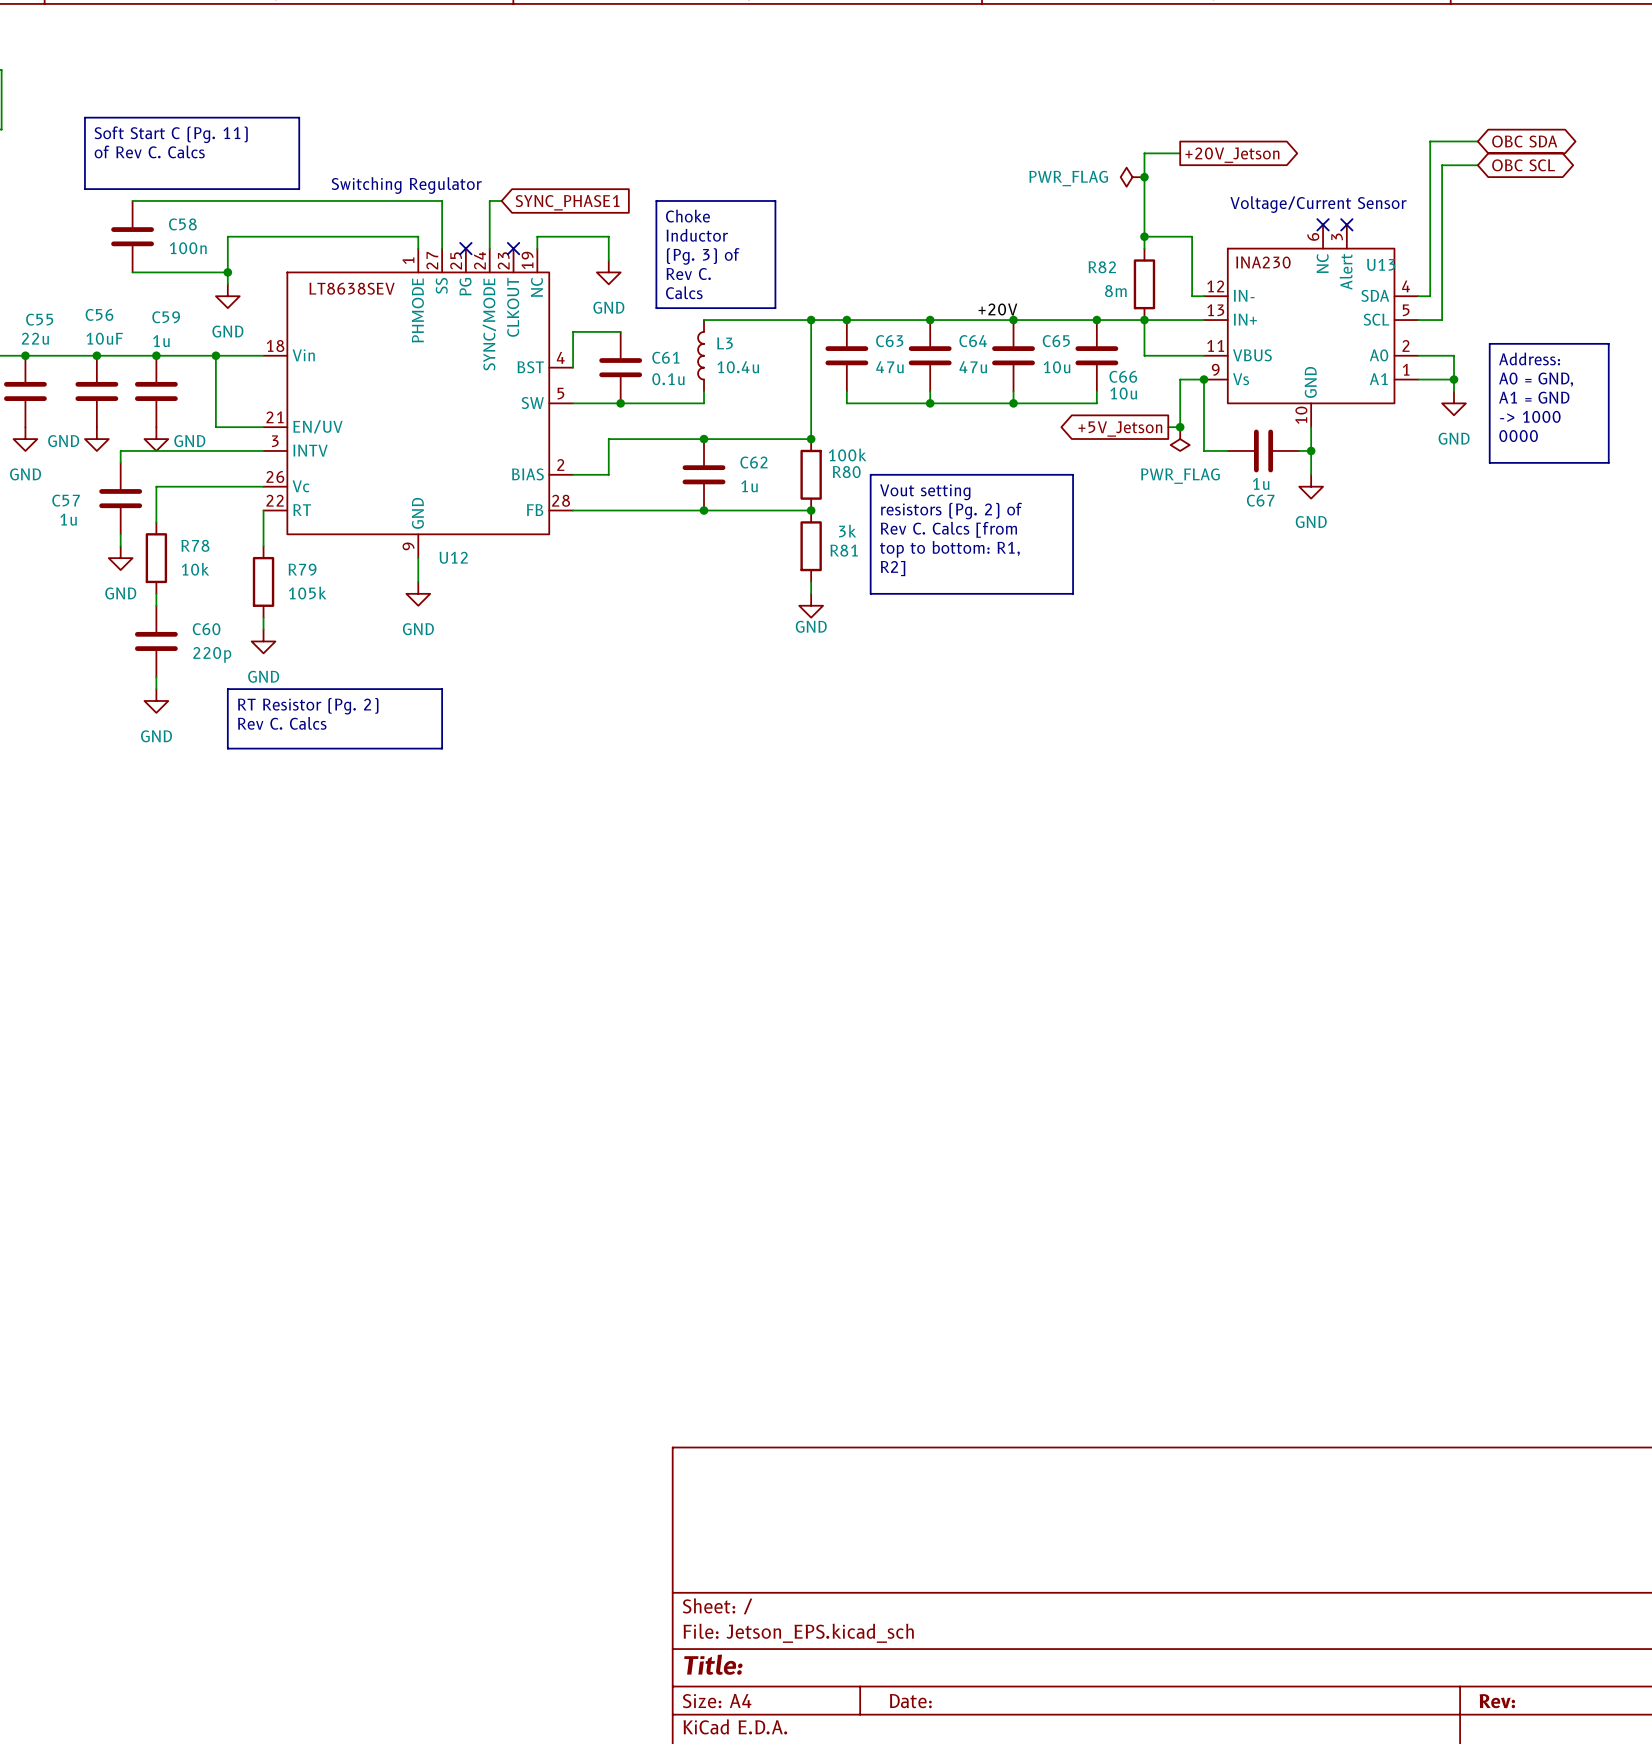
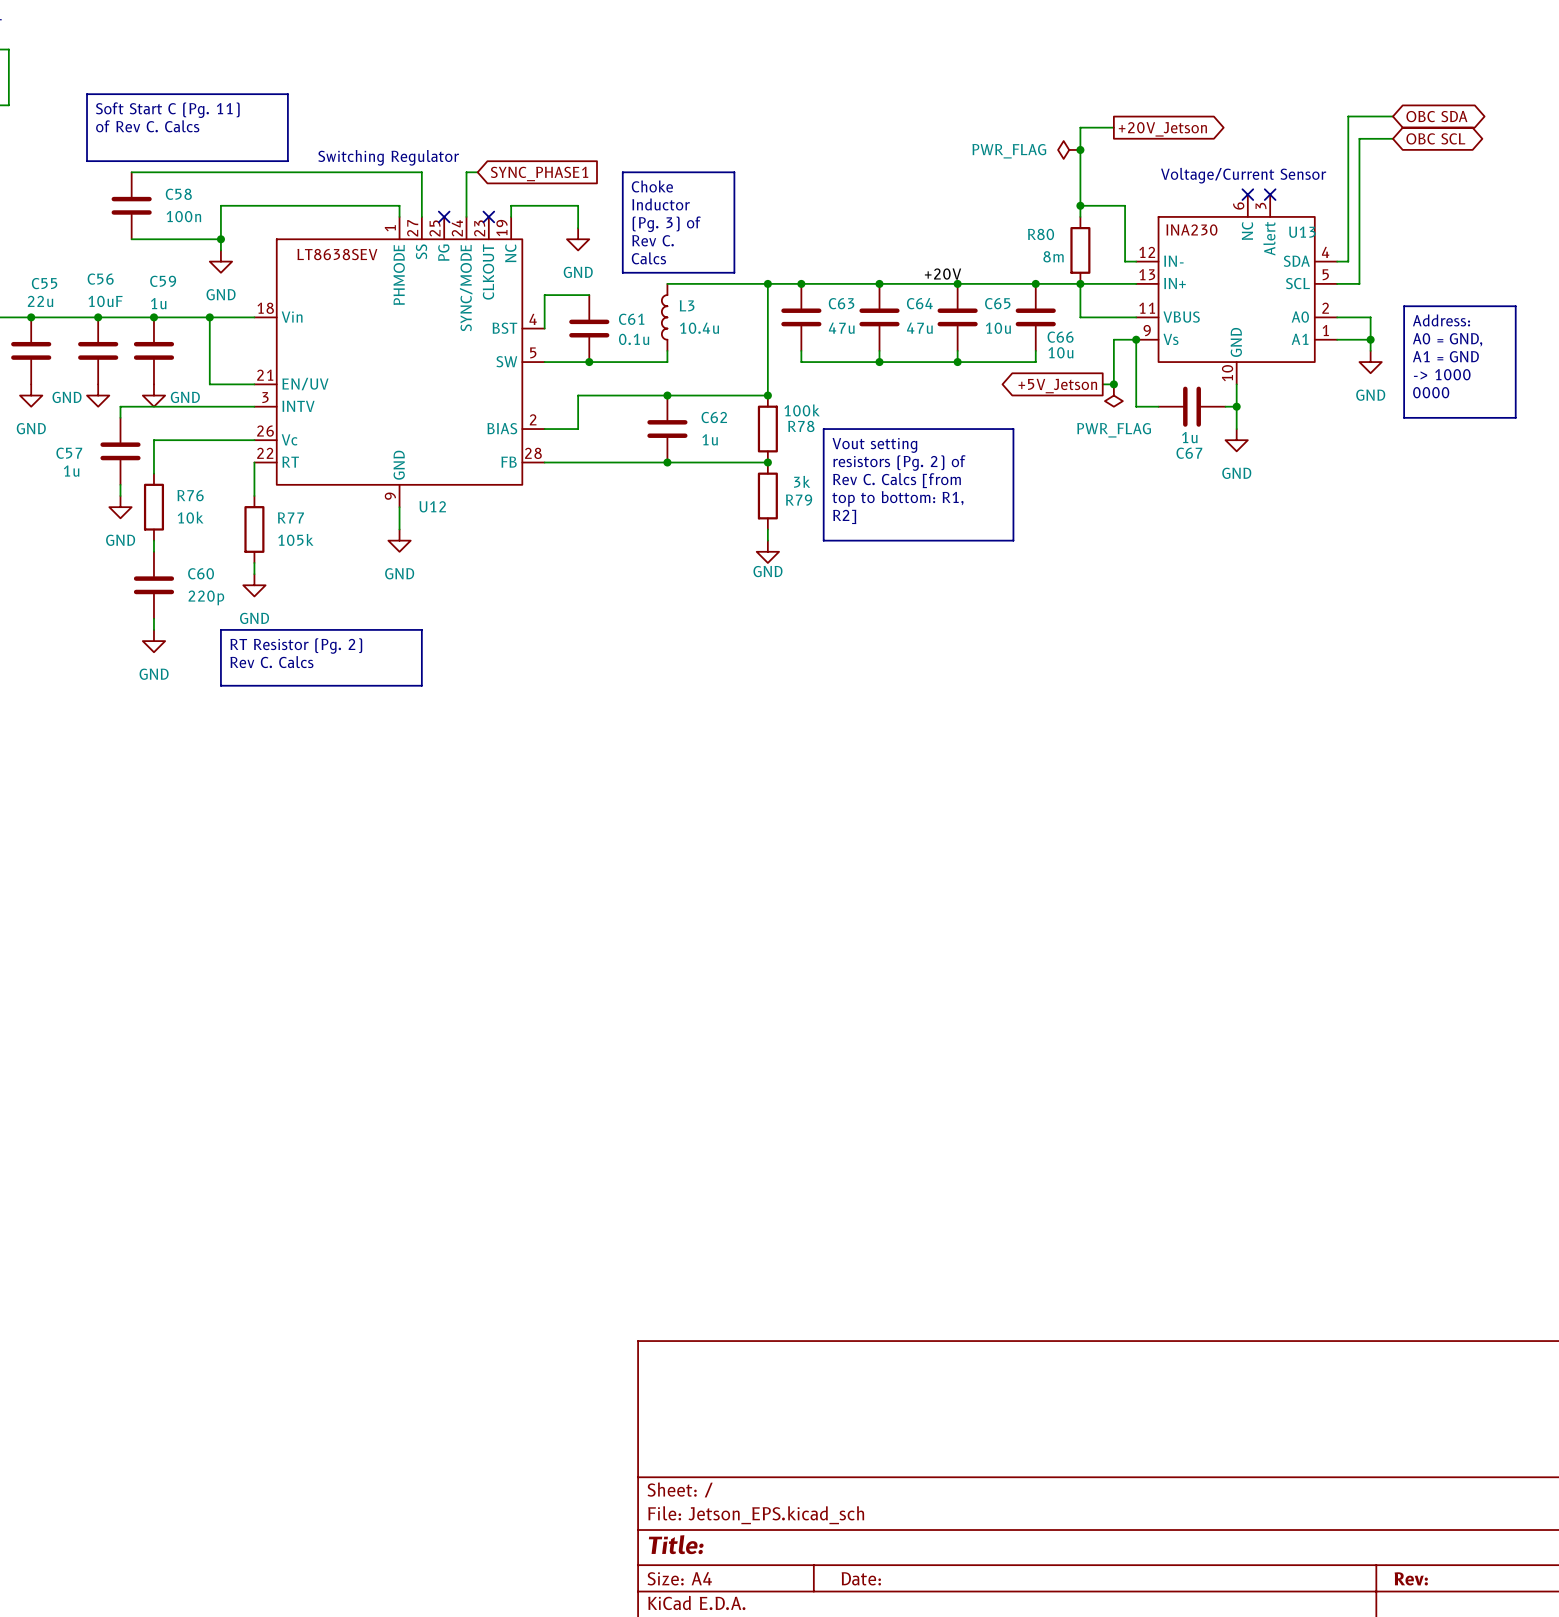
R82 name: R82 (1102, 267) -> R80 (1041, 234)
R80 name: R80 (846, 472) -> R78 (801, 426)
R78 name: R78 (195, 545) -> R76 (190, 495)
R81 name: R81 (844, 550) -> R79 (799, 500)
R79 name: R79 (302, 569) -> R77 (290, 517)

